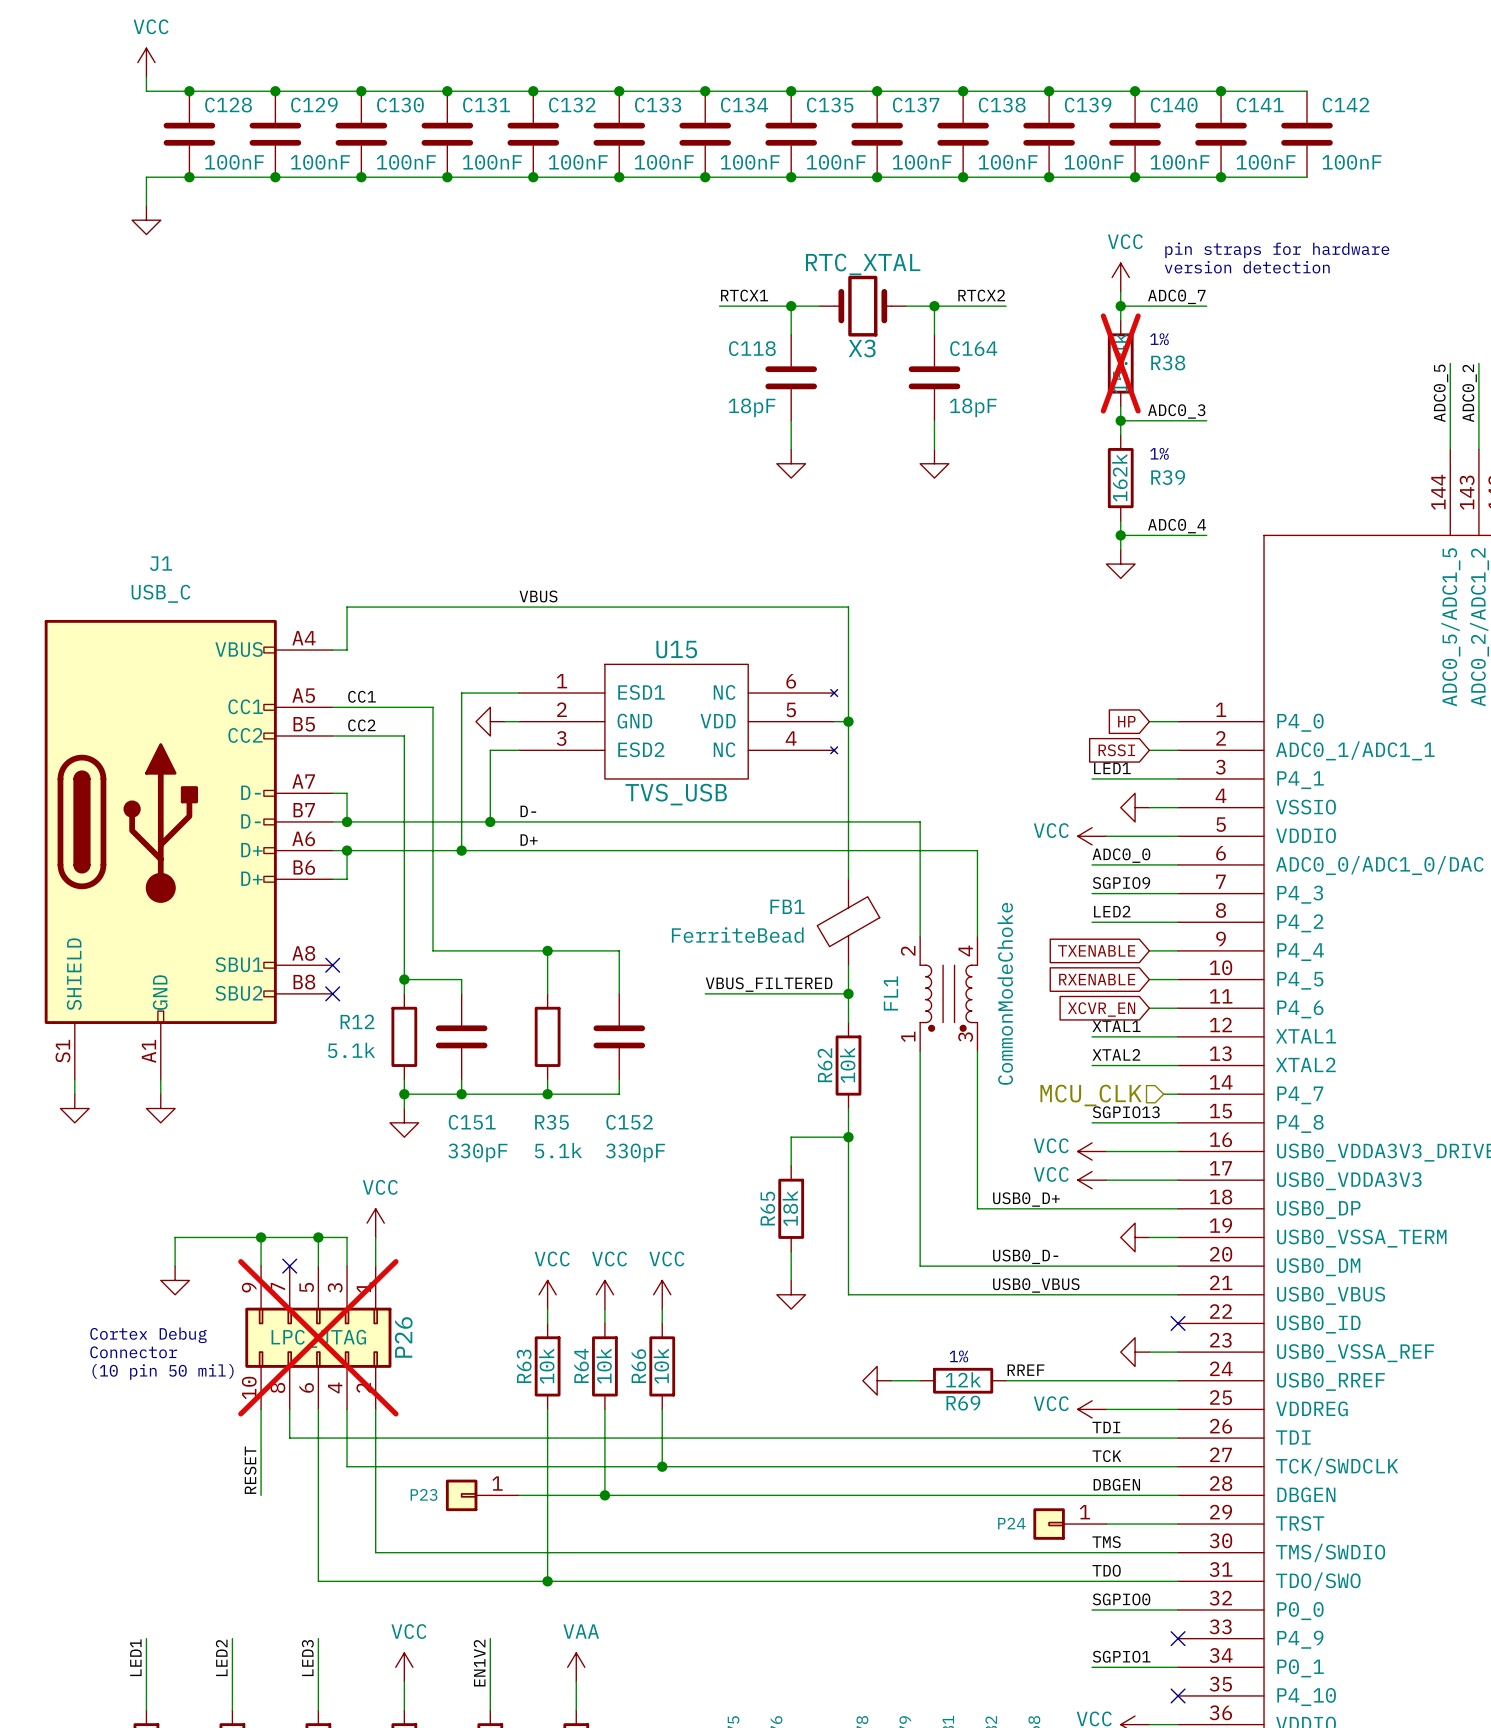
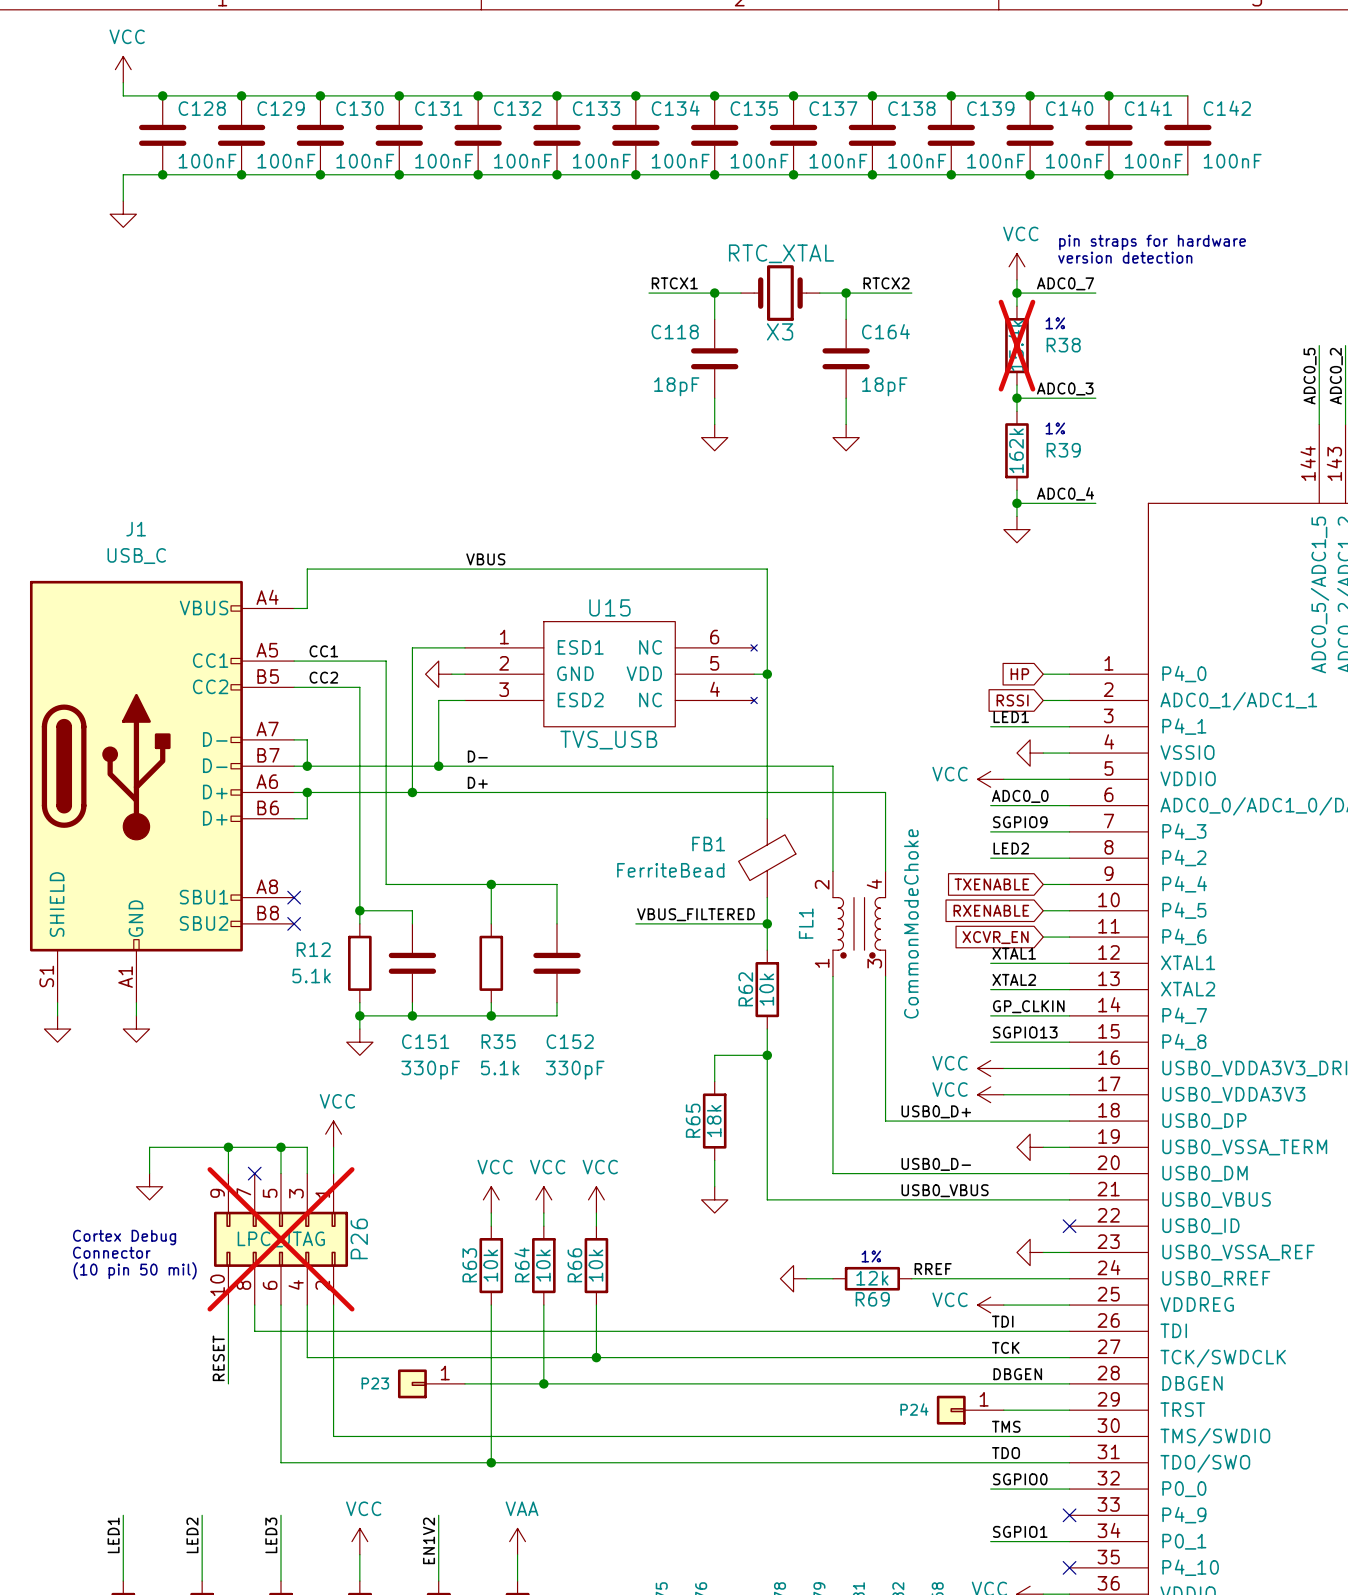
label: none -> GP_CLKIN (1028, 1006)
wire: none -> (990, 1015) (1056, 1015)
hierarchical label: MCU_CLK (1091, 1095) -> none

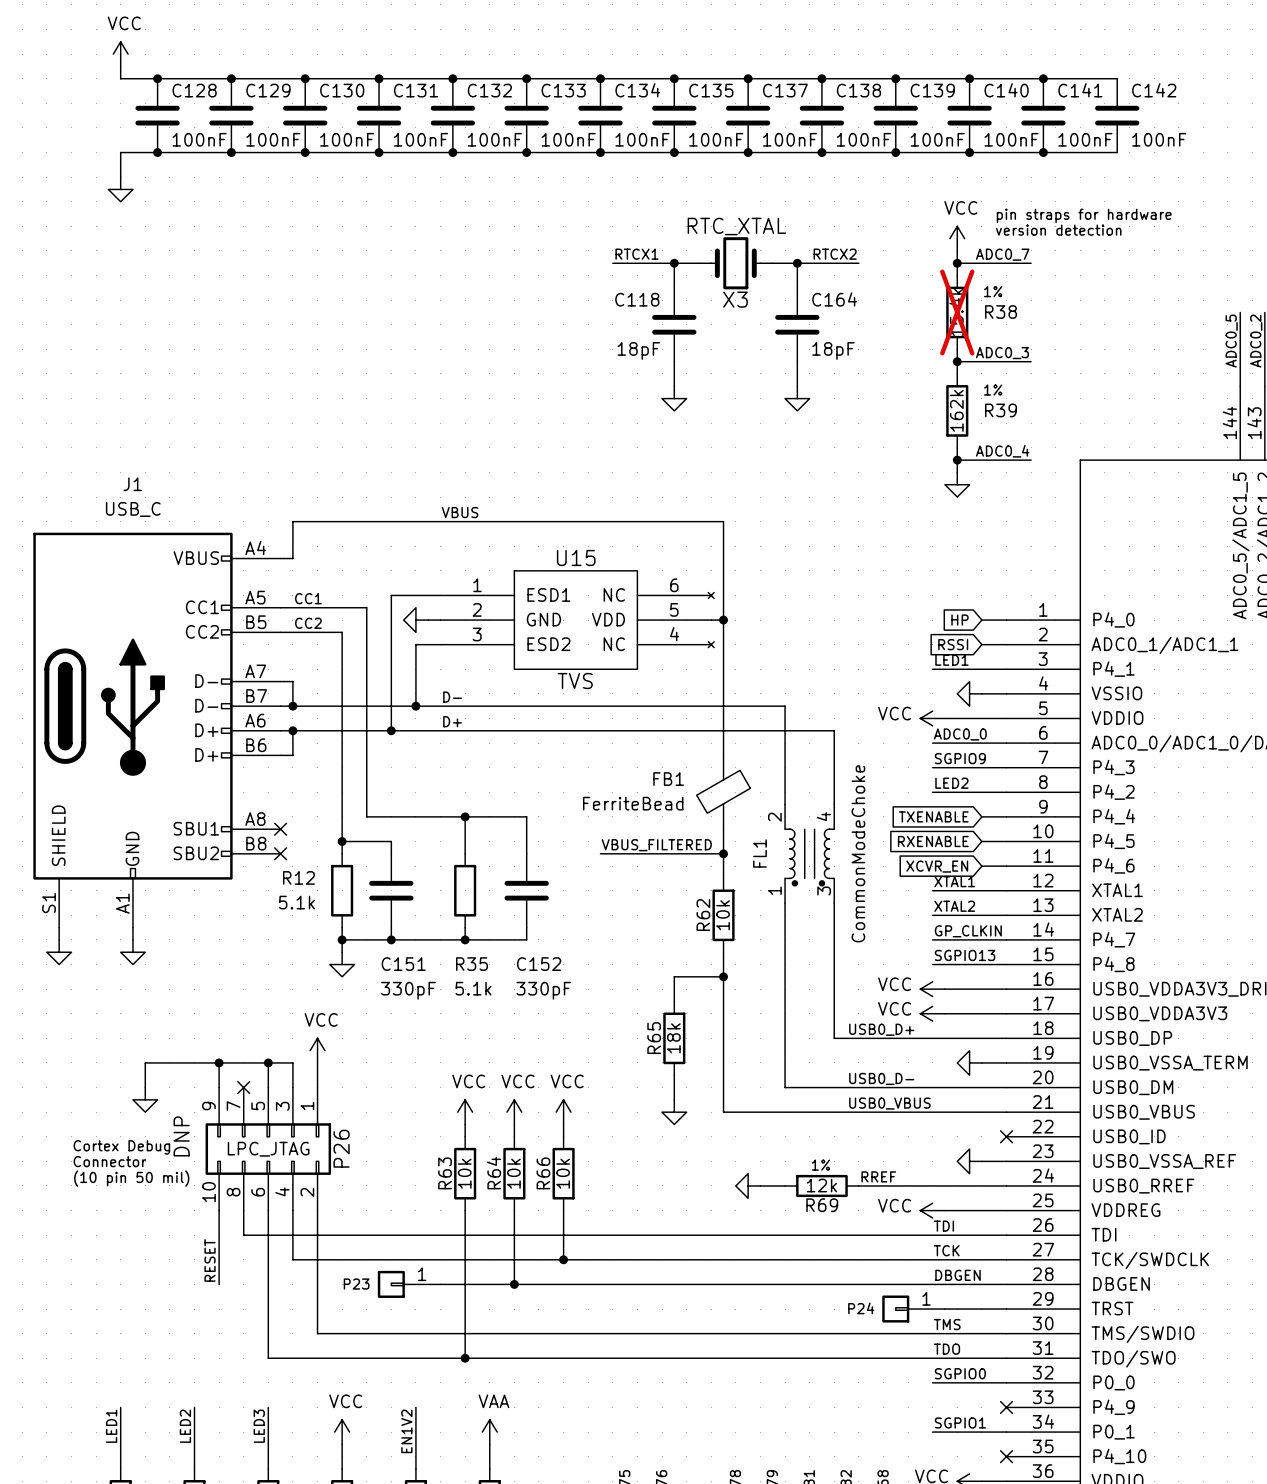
U15 value: TVS_USB (608, 740) -> TVS (575, 681)
P26 text: none -> DNP (181, 1136)
P26 do-not-place cross: (280, 1239) -> none

